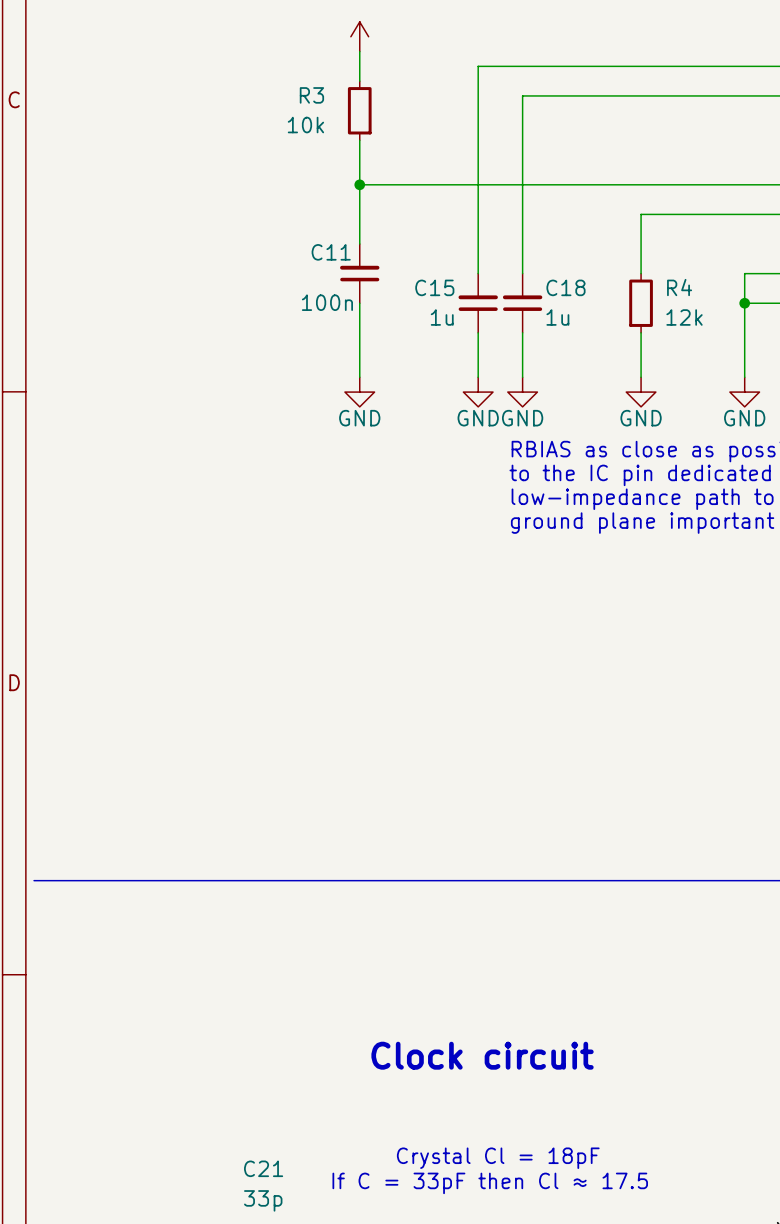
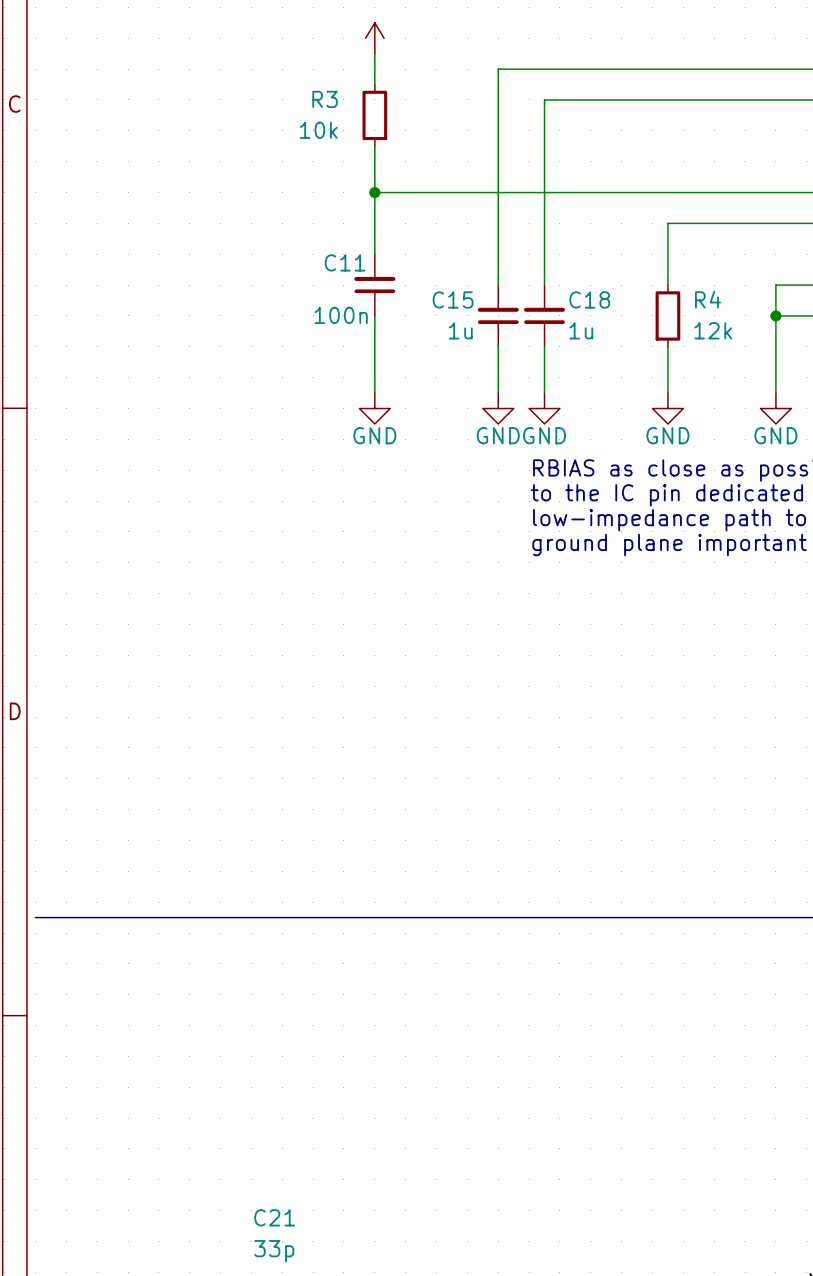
text: Clock circuit (482, 1055) -> none
text: Crystal Cl = 18pF (498, 1158) -> none
text: If C = 33pF then Cl ≈ 17.5 (490, 1183) -> none

